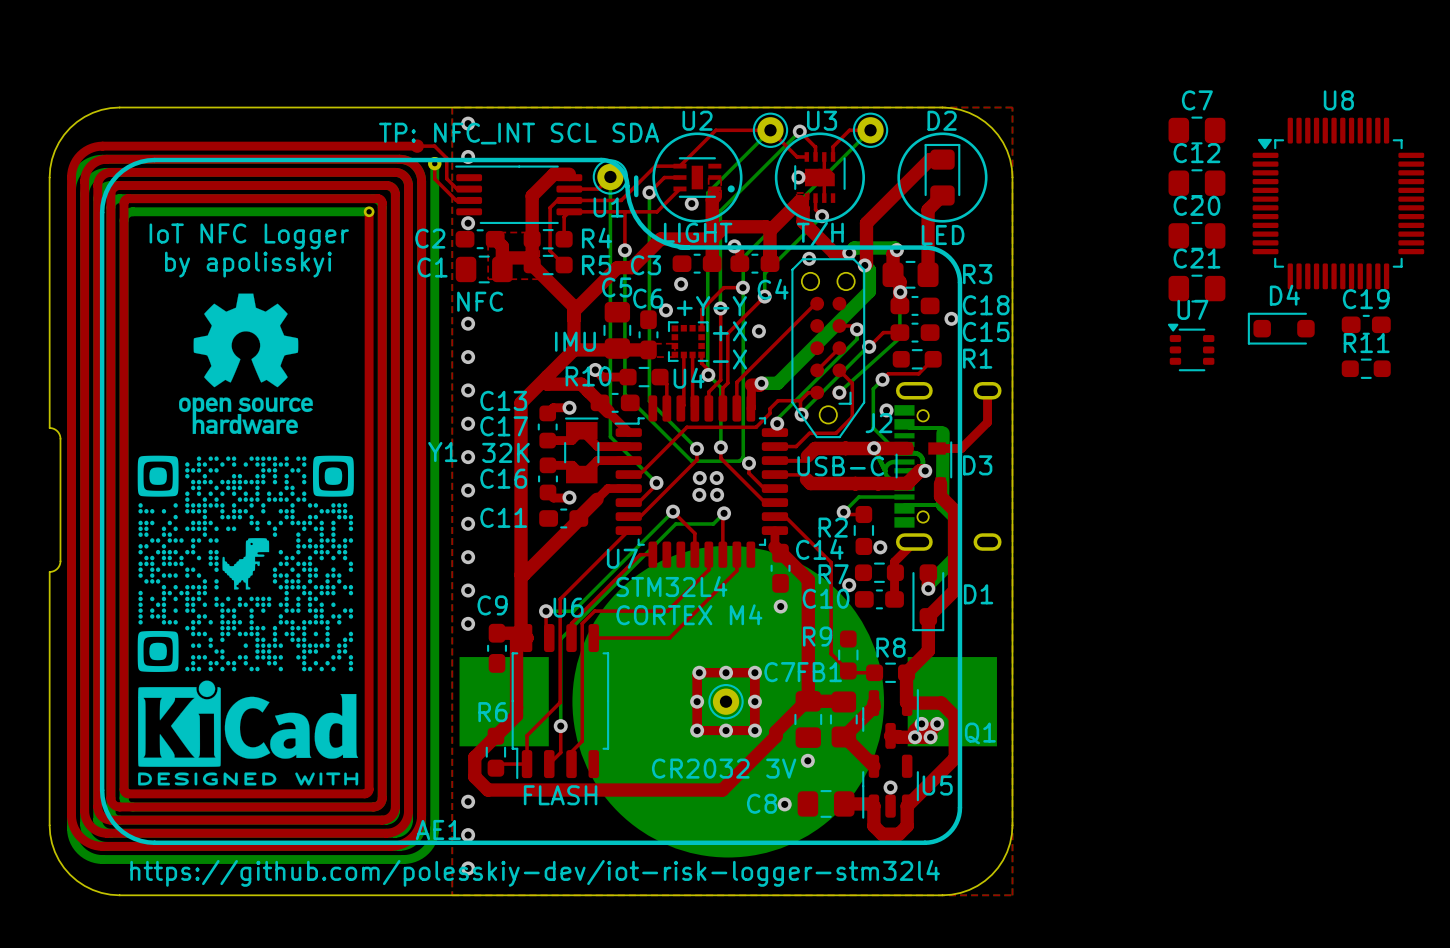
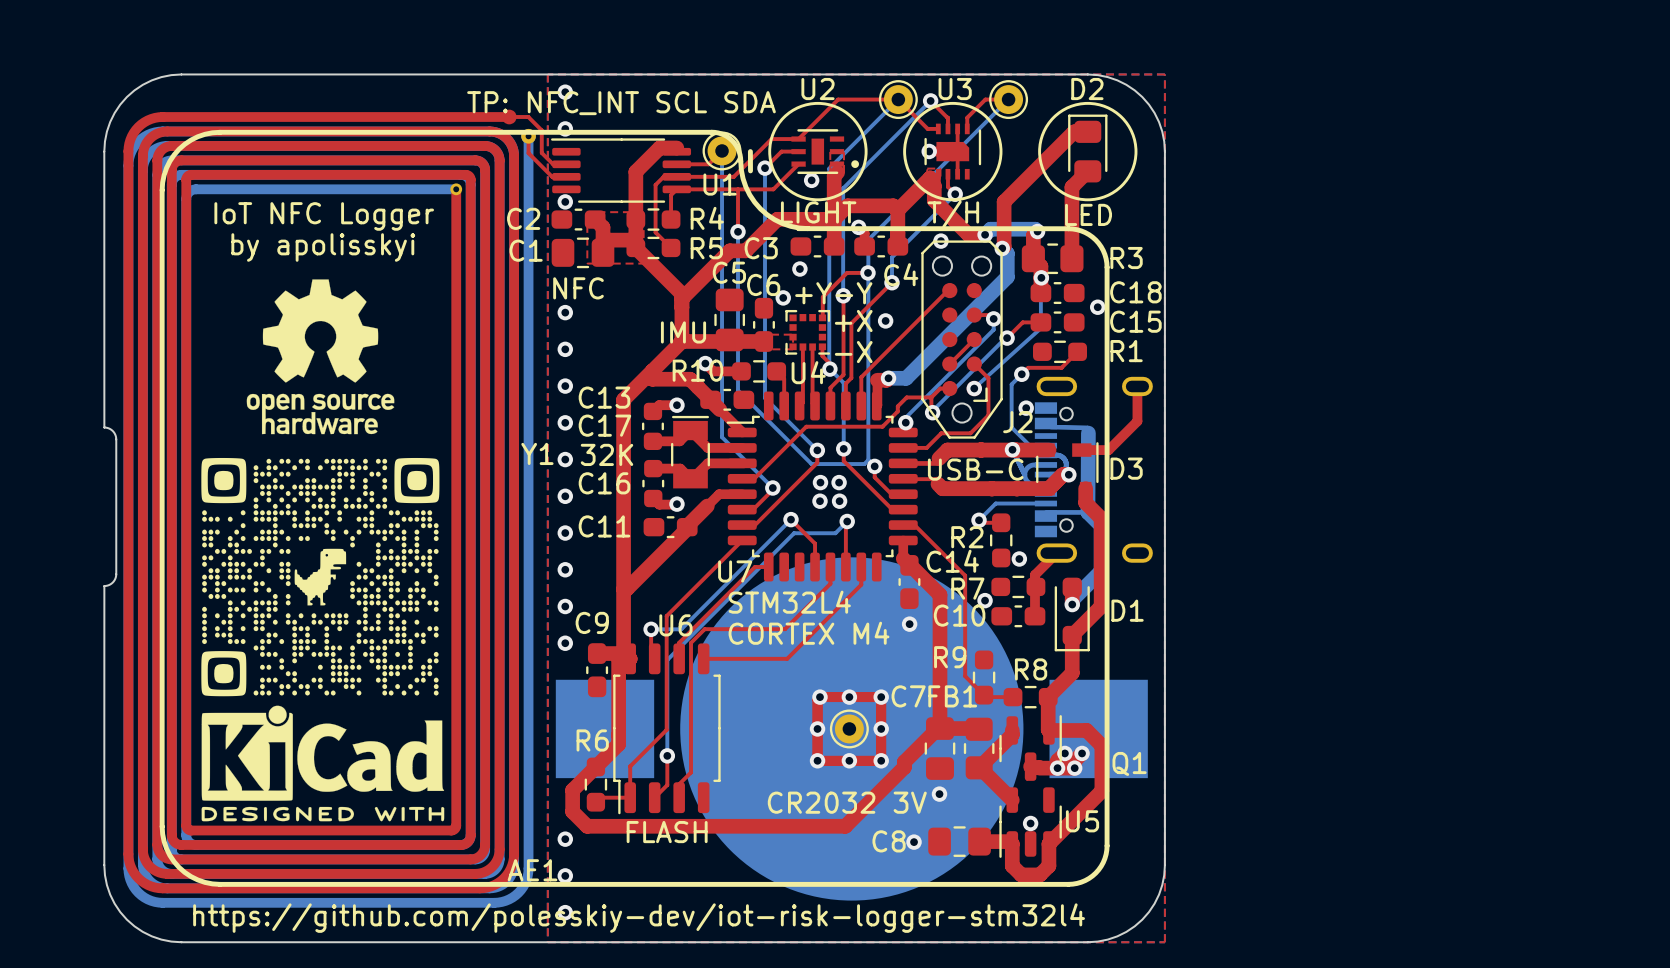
C7: (1196, 130) -> none
C12: (1196, 183) -> none
U8: (1338, 203) -> none
C20: (1196, 235) -> none
C21: (1196, 288) -> none
C19: (1366, 324) -> none
D4: (1281, 328) -> none
U7: (1191, 347) -> none
R11: (1366, 368) -> none

